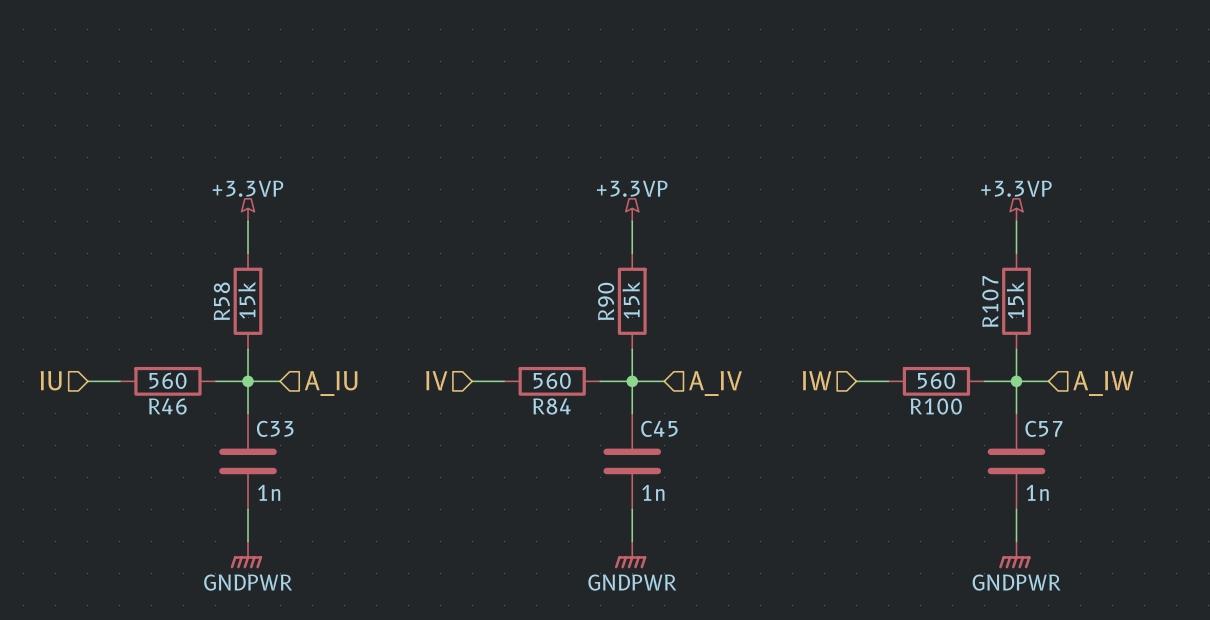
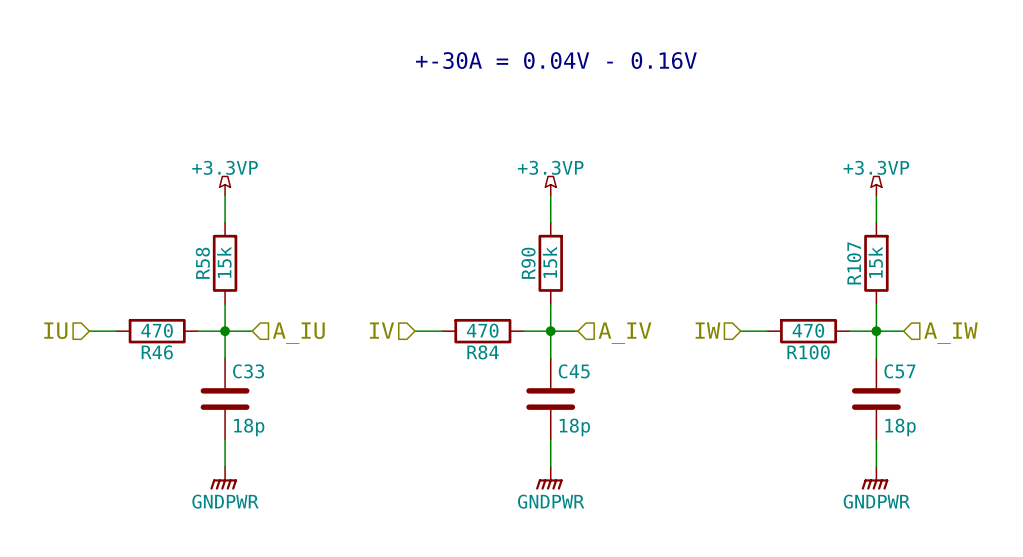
text: none -> +-30A = 0.04V - 0.16V (556, 60)
R46 value: 560 (168, 380) -> 470 (157, 330)
R84 value: 560 (552, 380) -> 470 (482, 330)
R100 value: 560 (936, 380) -> 470 (808, 330)
C33 value: 1n (269, 492) -> 18p (249, 427)
C45 value: 1n (653, 492) -> 18p (574, 427)
C57 value: 1n (1037, 492) -> 18p (900, 427)

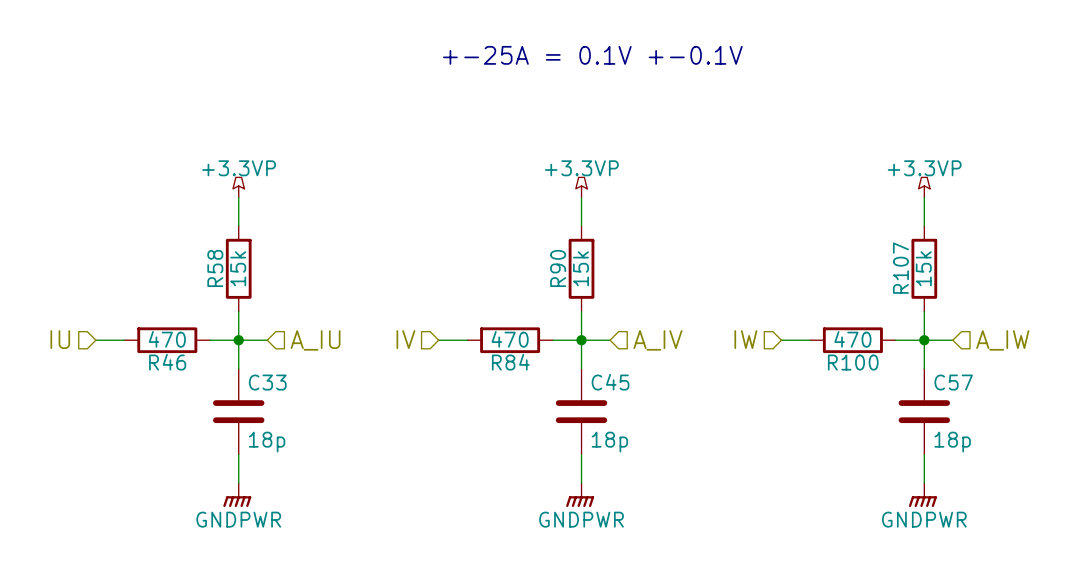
text: +-30A = 0.04V - 0.16V (556, 60) -> +-25A = 0.1V +-0.1V (592, 55)

